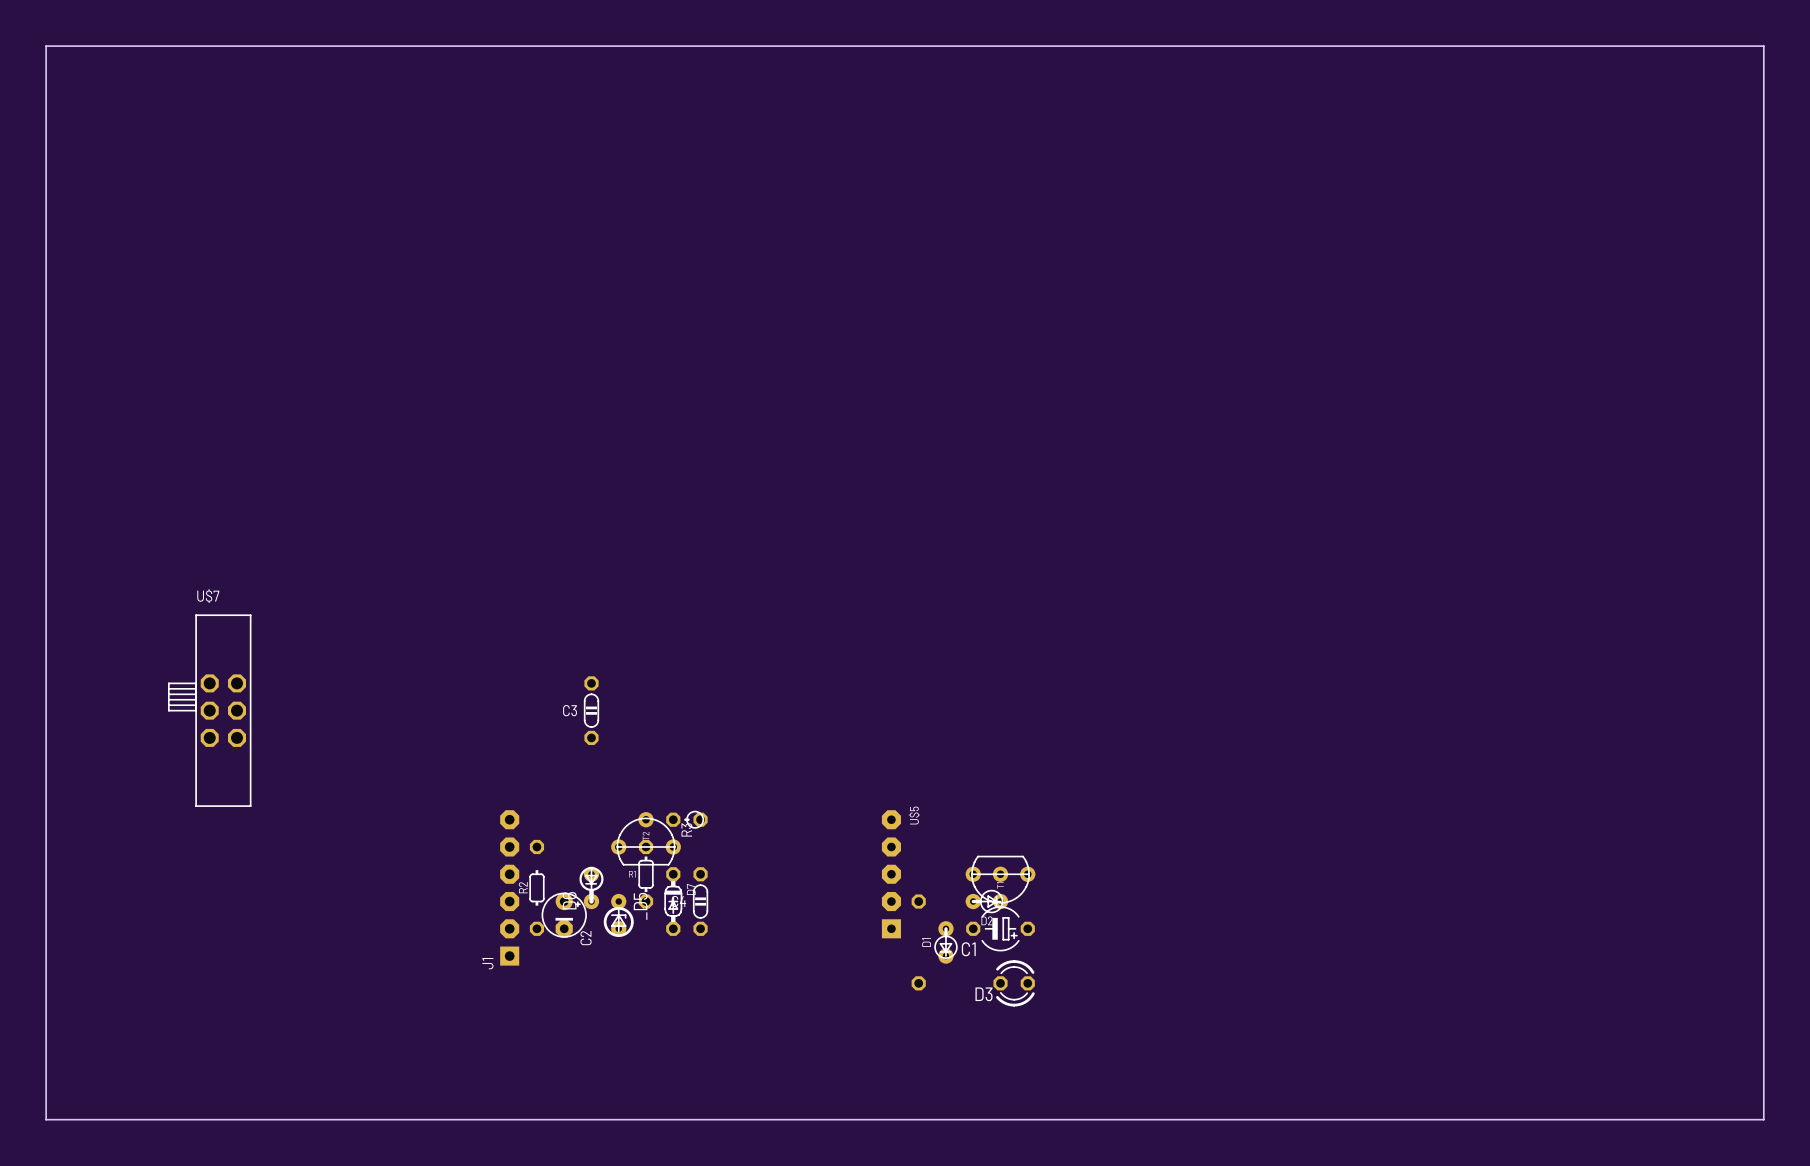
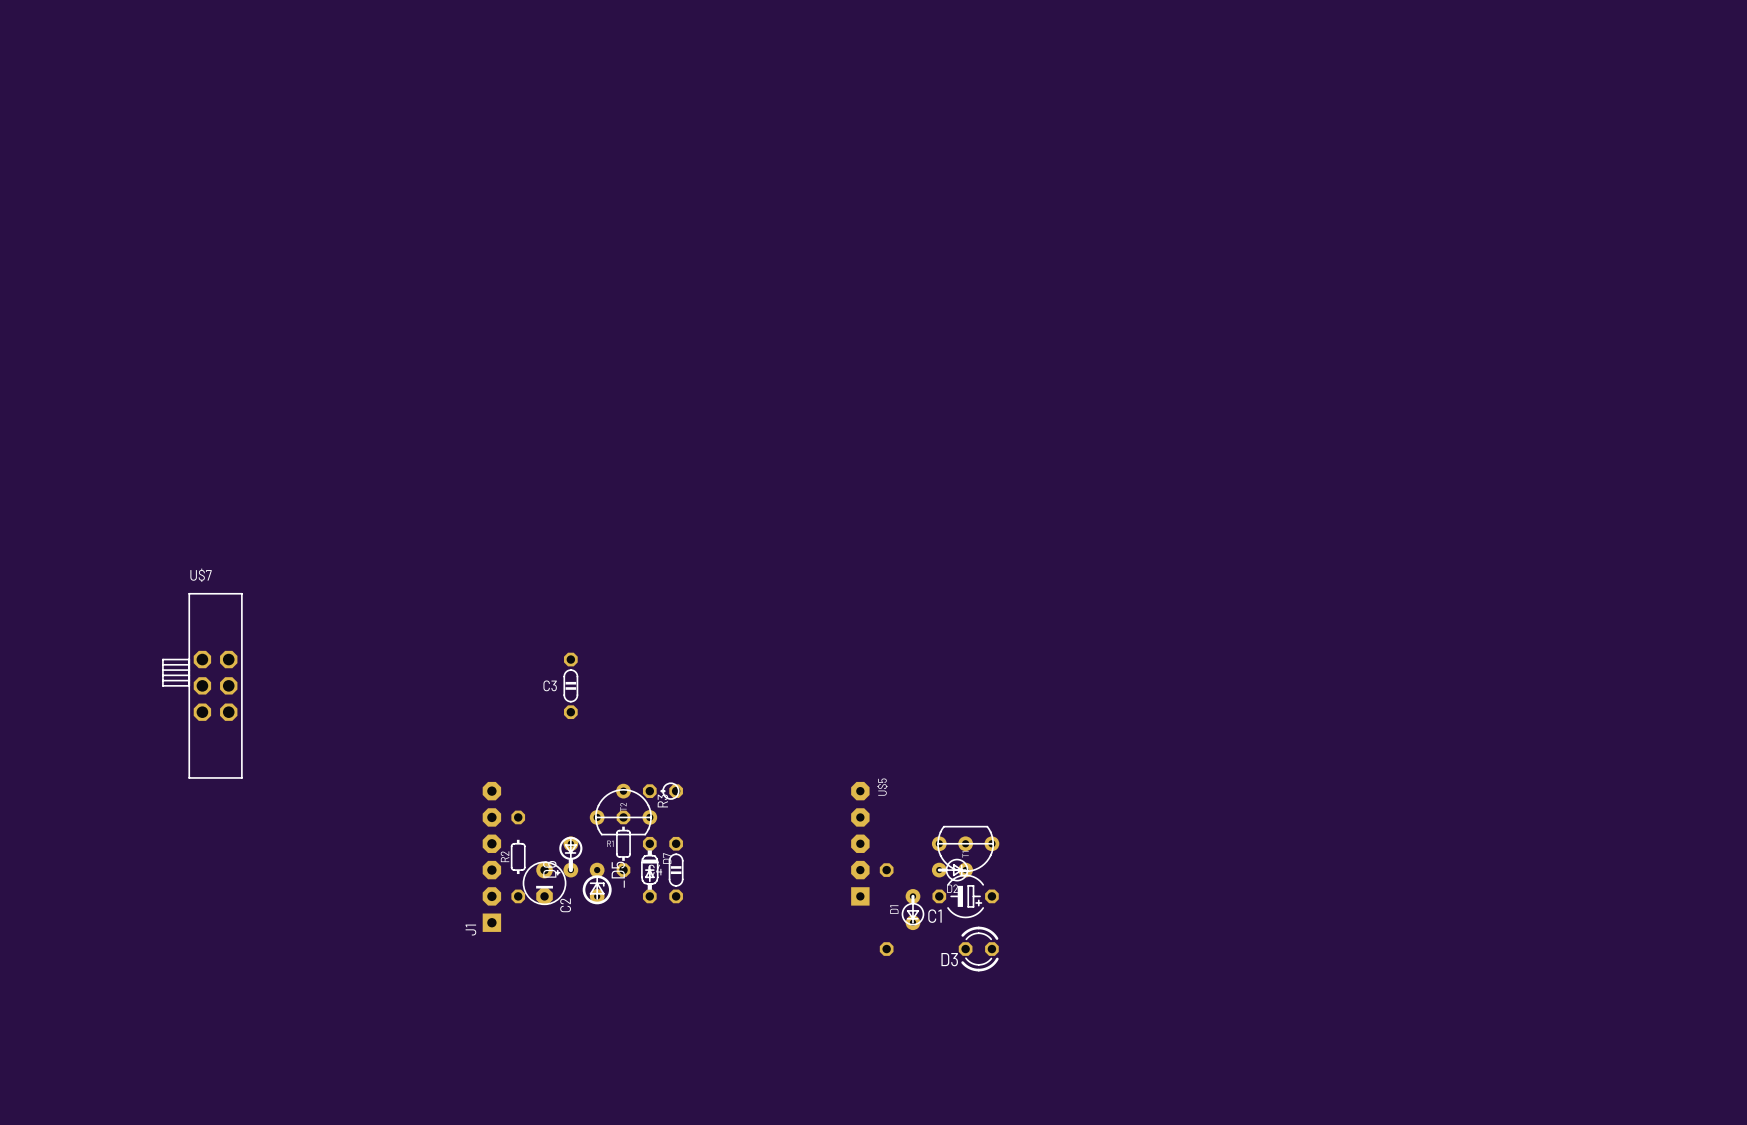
board edge: (46, 46) (1763, 46) (1763, 1119) (46, 1119) (46, 46) -> none

